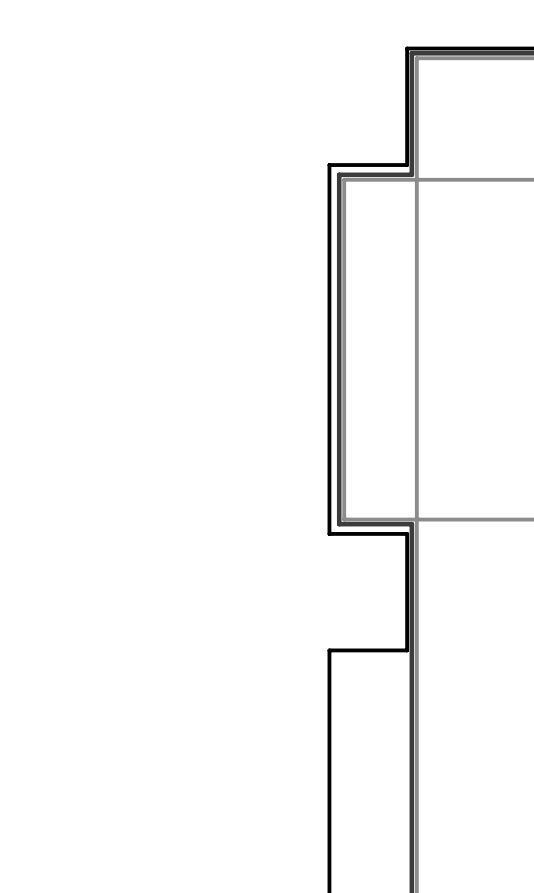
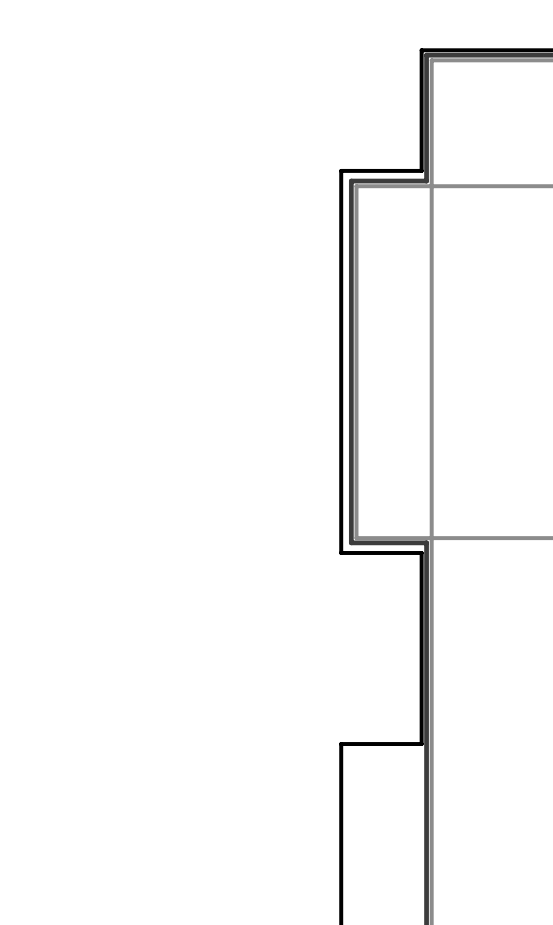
board edge: (407, 650) (329, 650) (329, 718) -> (421, 673) (421, 744) (341, 744)

